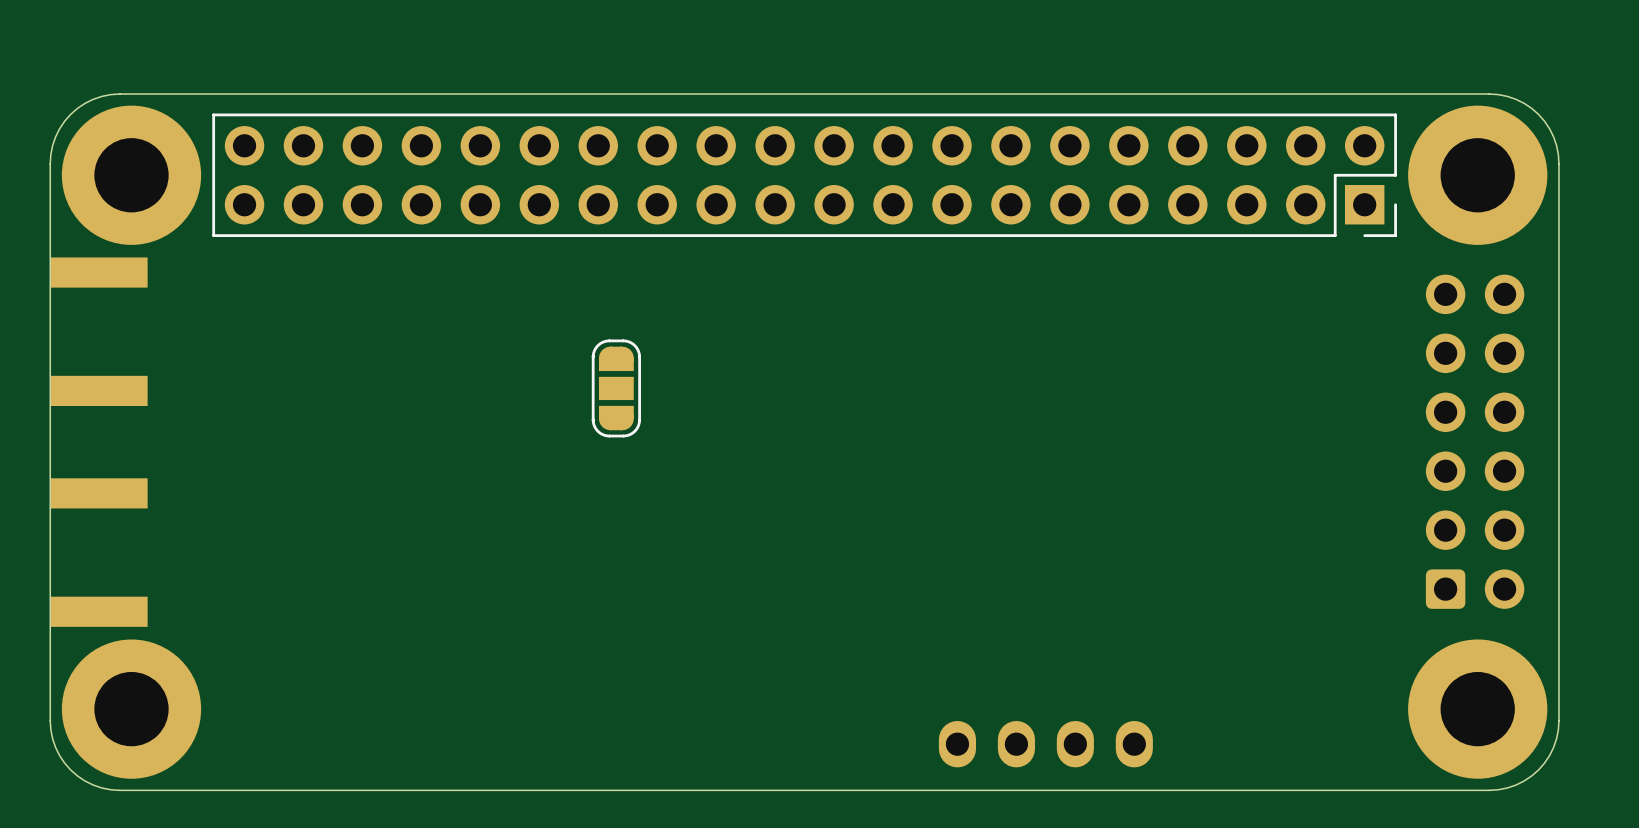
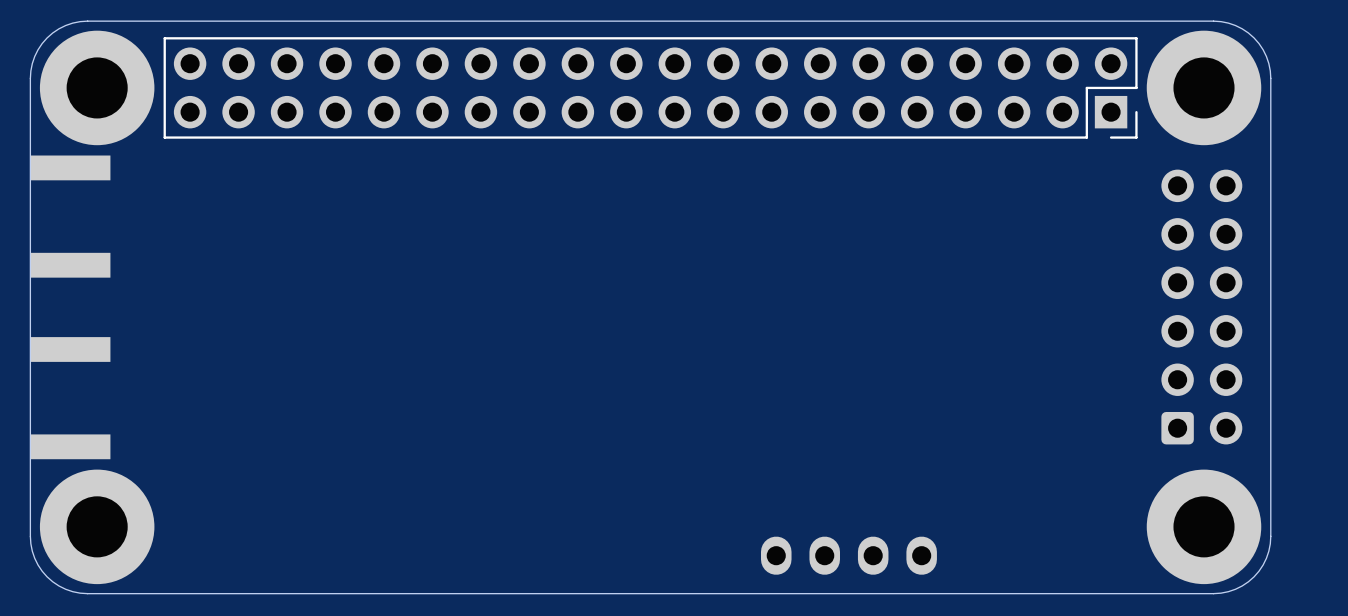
part: (616, 388) -> none

